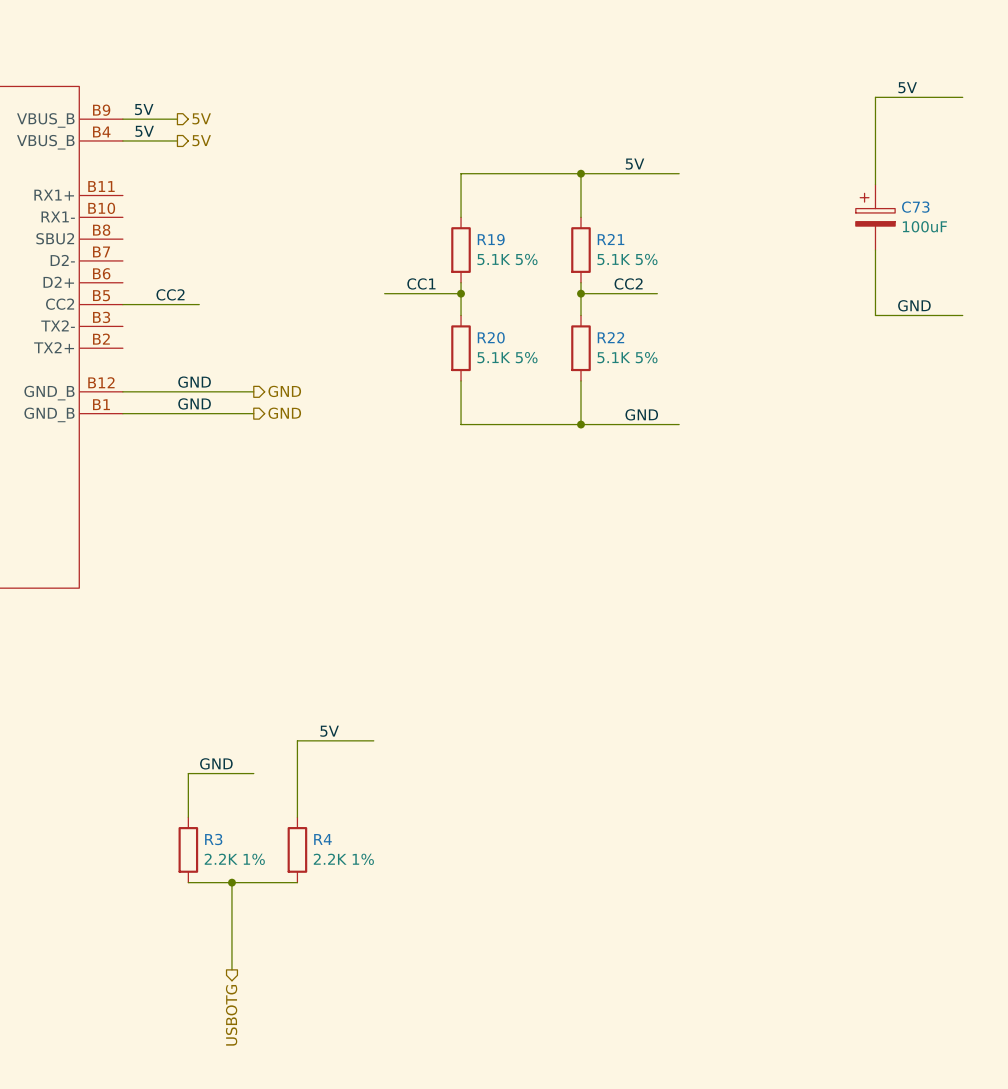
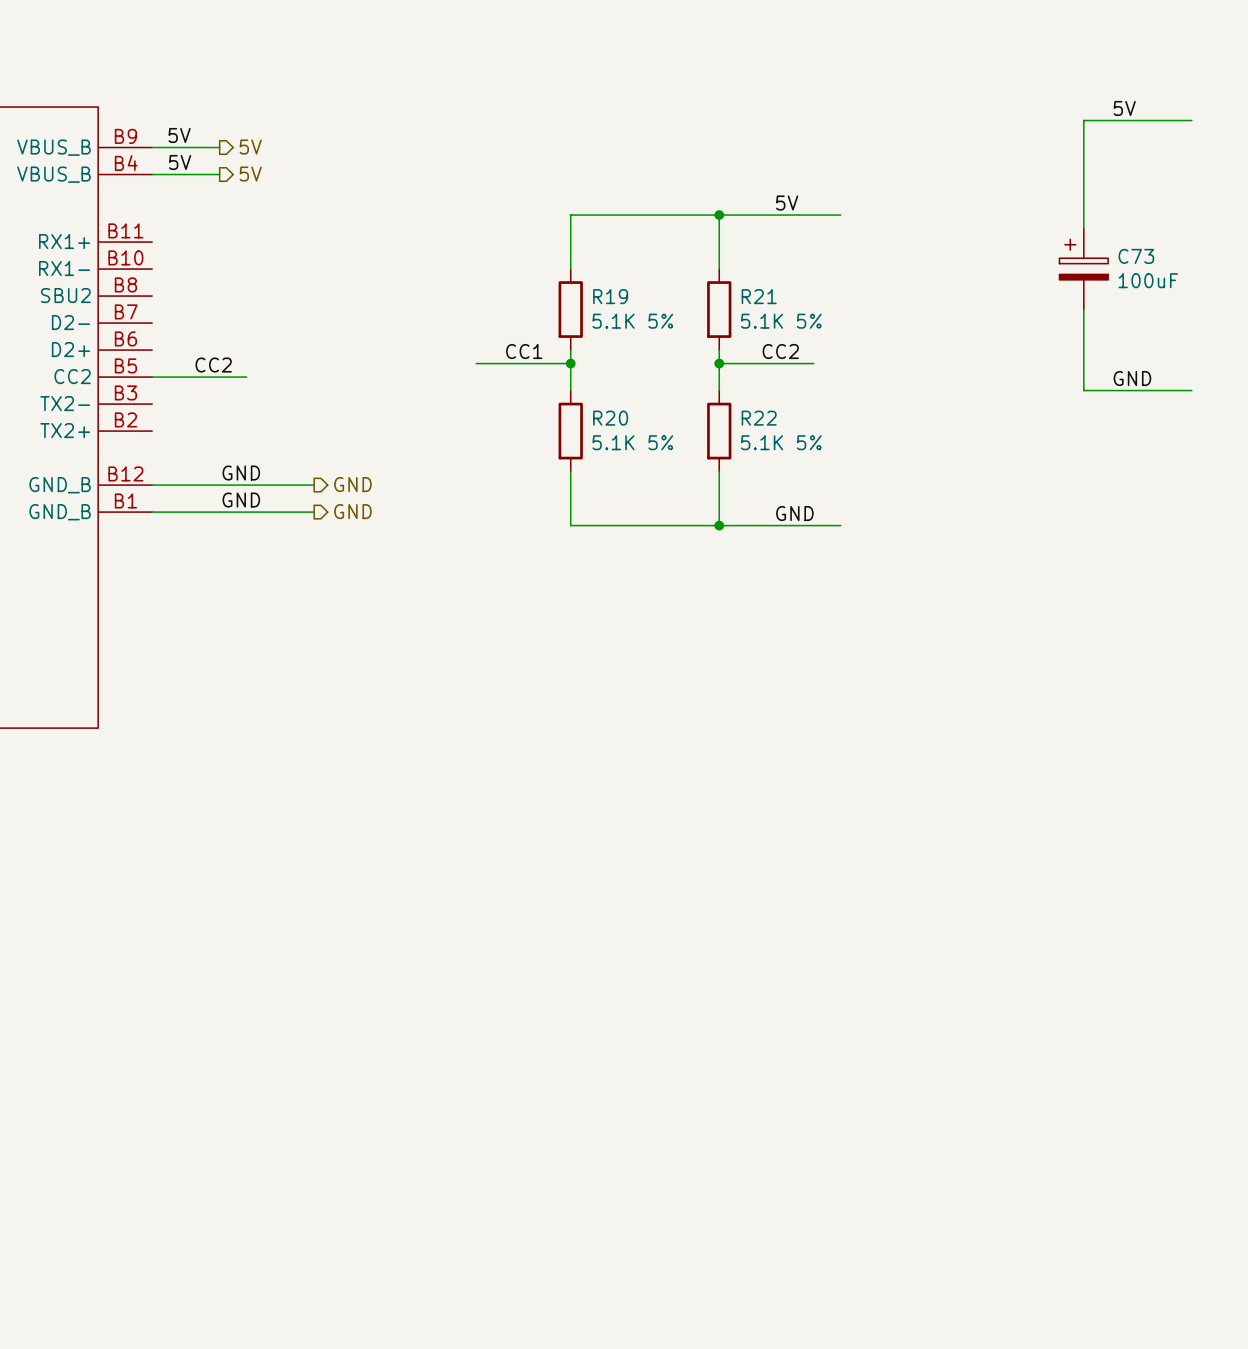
label: 5V (329, 731) -> none
wire: (373, 740) (297, 740) (297, 817) -> none
label: GND (216, 763) -> none
wire: (253, 773) (188, 773) (188, 817) -> none
R3: 2.2K 1% (188, 849) -> none
R4: 2.2K 1% (297, 849) -> none
wire: (188, 882) (297, 882) -> none
wire: (231, 882) (231, 969) -> none
junction: (231, 882) -> none
hierarchical label: USBOTG (231, 1015) -> none

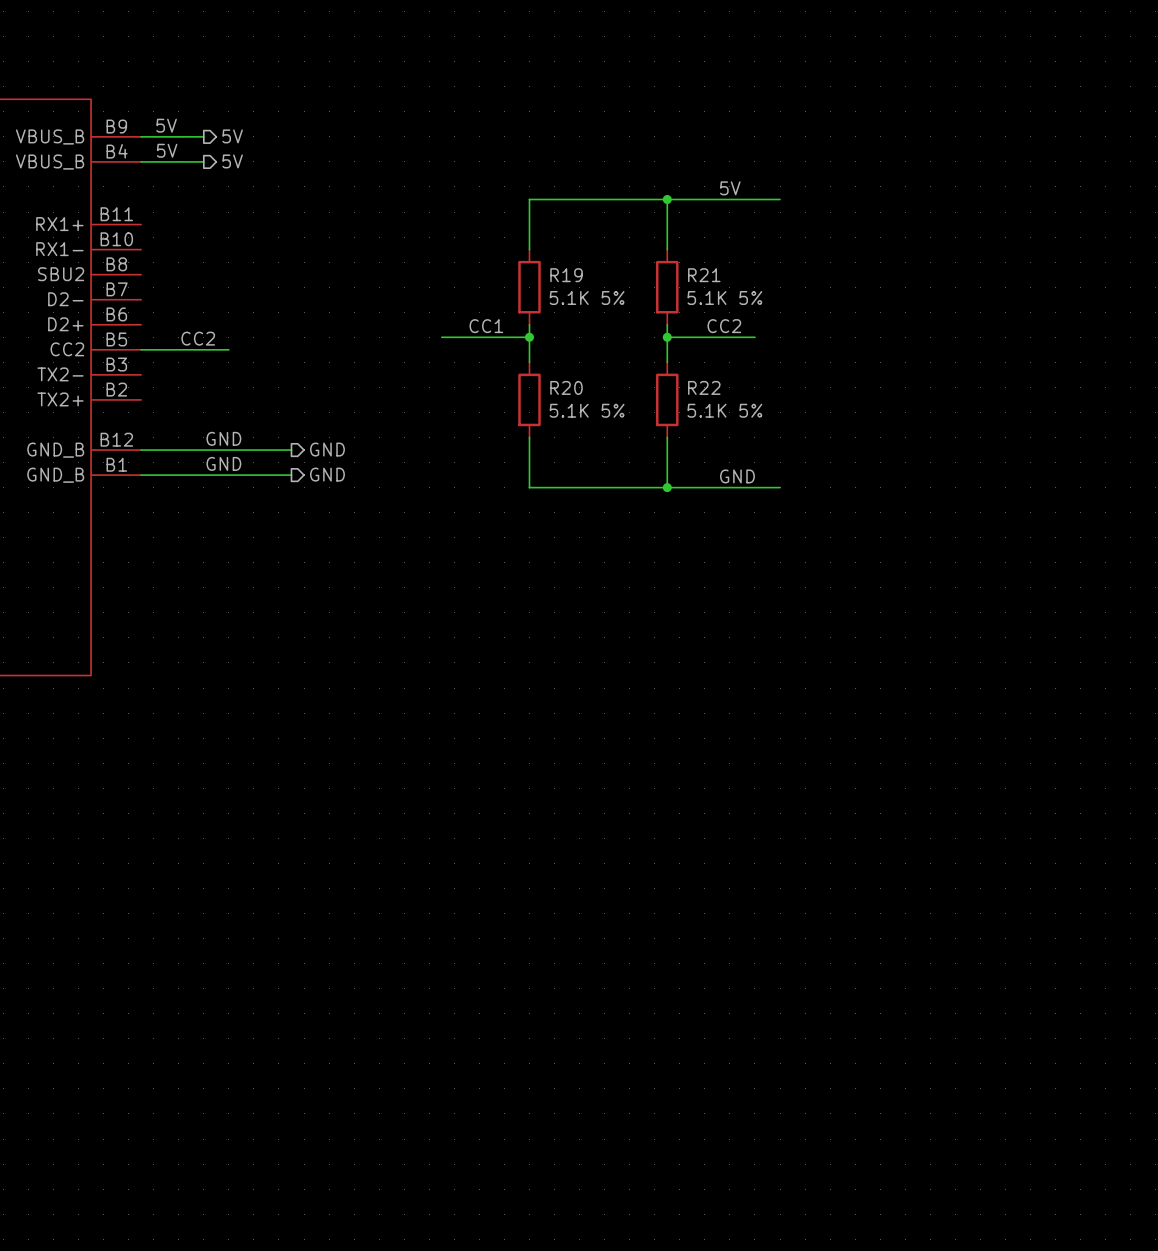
label: 5V (1124, 108) -> none
wire: (1191, 120) (1083, 120) (1083, 228) -> none
C73: 100uF (1083, 269) -> none
wire: (1083, 309) (1083, 390) (1191, 390) -> none
label: GND (1132, 378) -> none

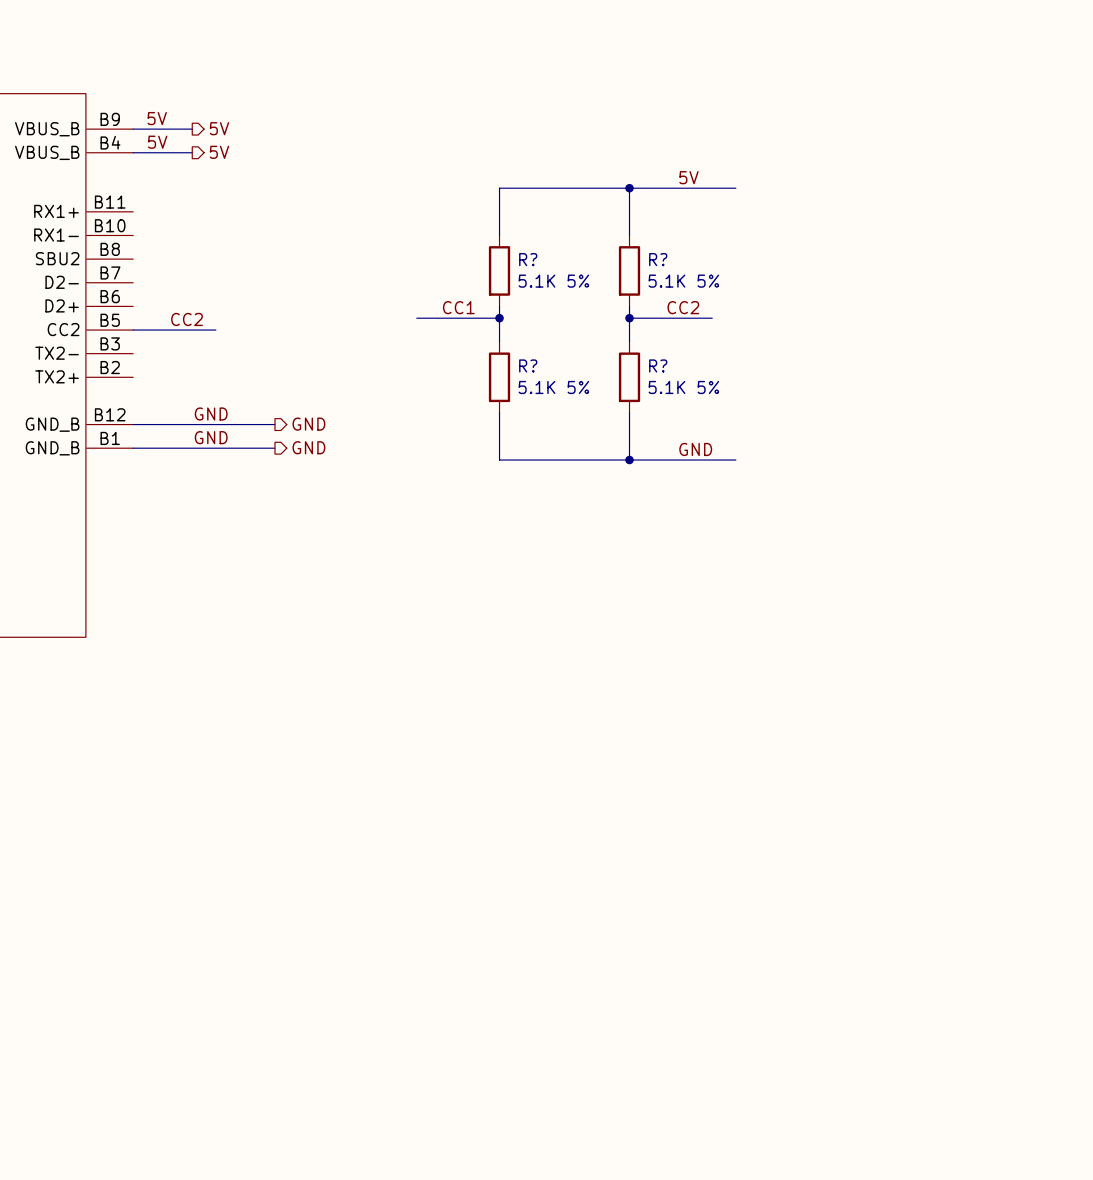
R19 name: R19 (566, 275) -> R? (528, 259)
R21 name: R21 (704, 275) -> R? (658, 259)
R20 name: R20 (566, 387) -> R? (528, 365)
R22 name: R22 (704, 387) -> R? (658, 365)

